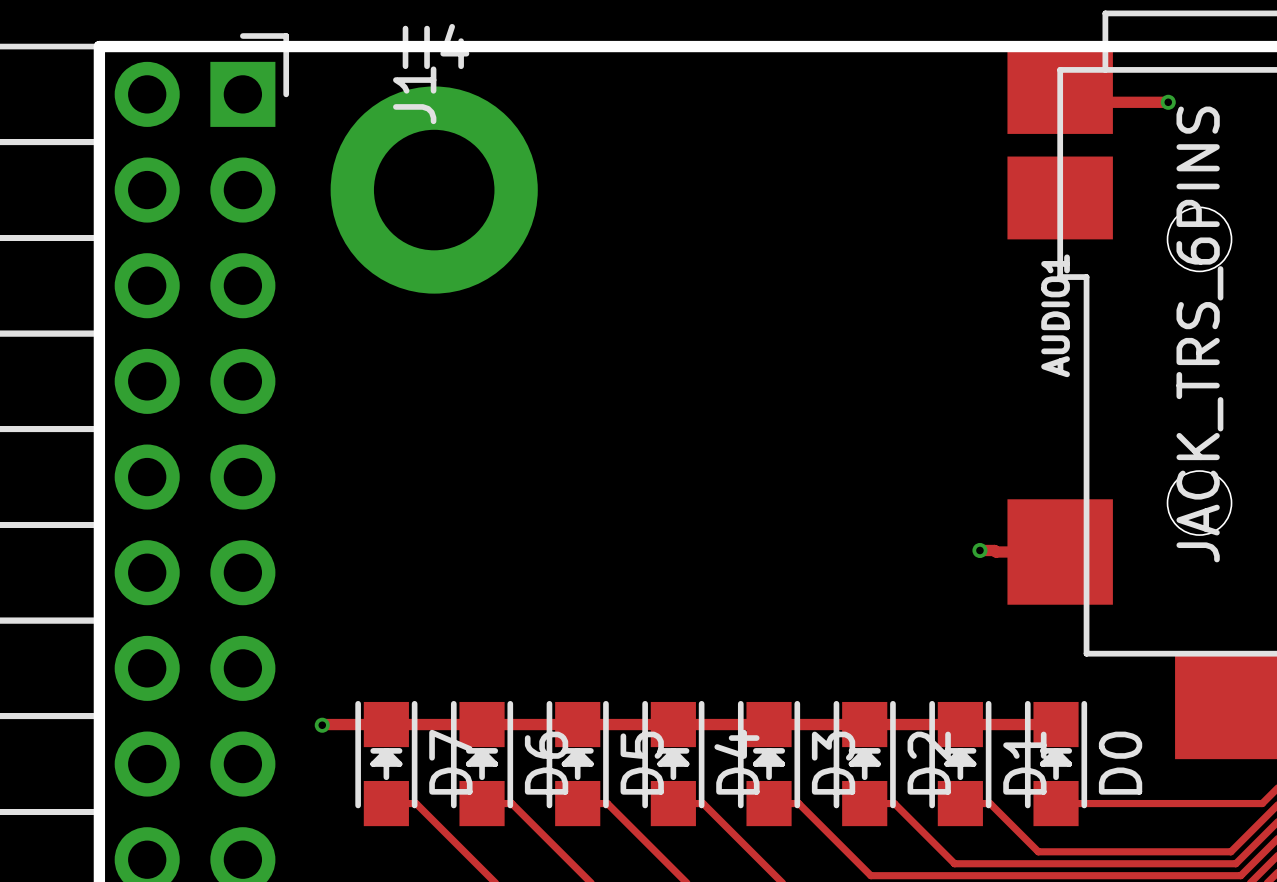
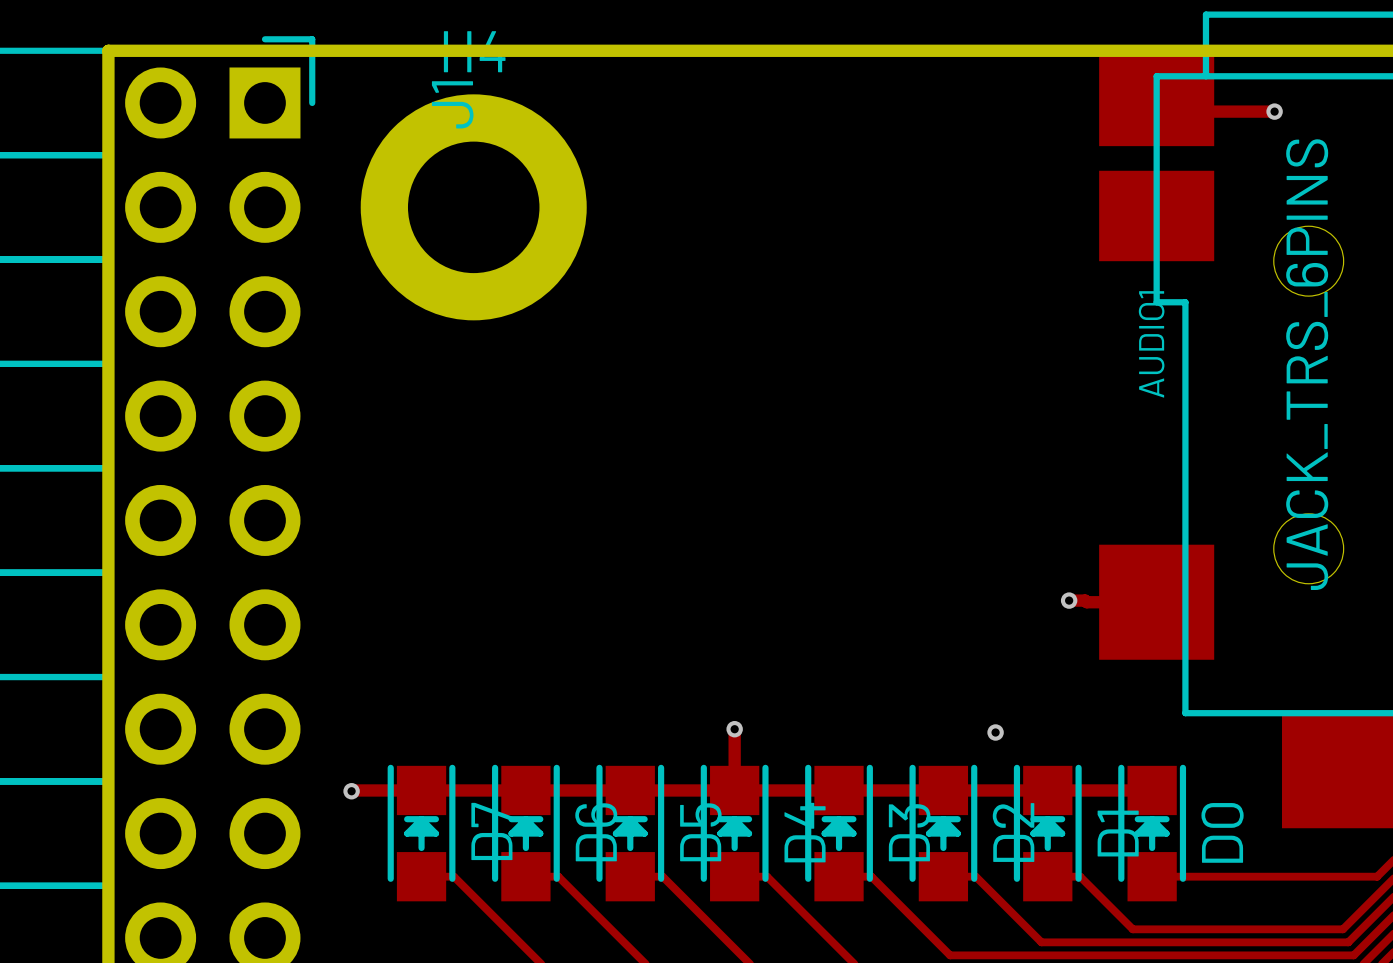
track: none -> (734, 729) (734, 790)
via: none -> (734, 729)
via: none -> (995, 732)

